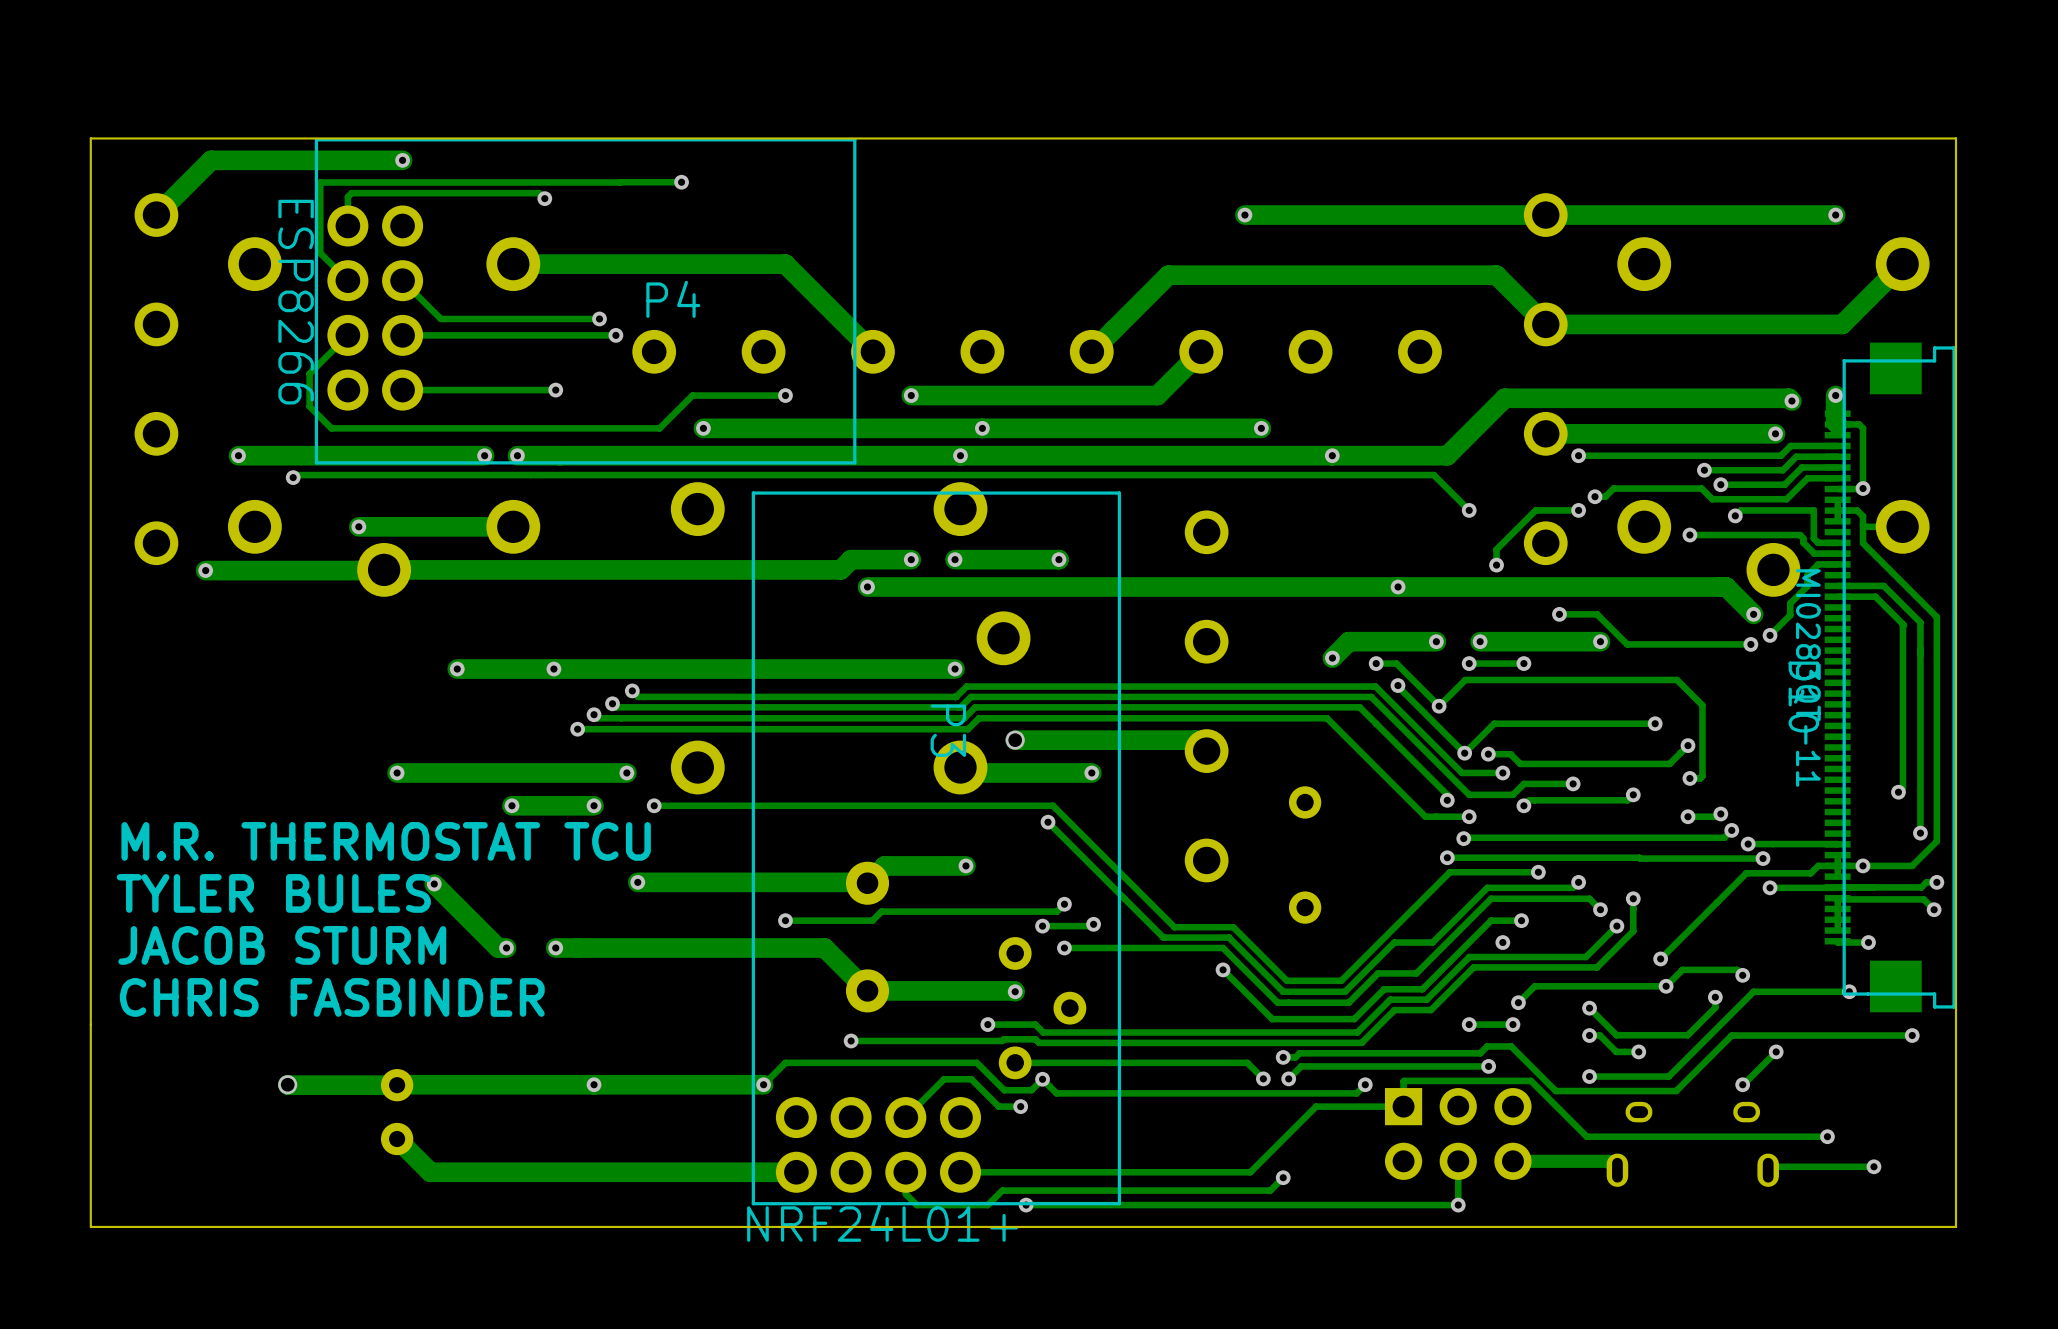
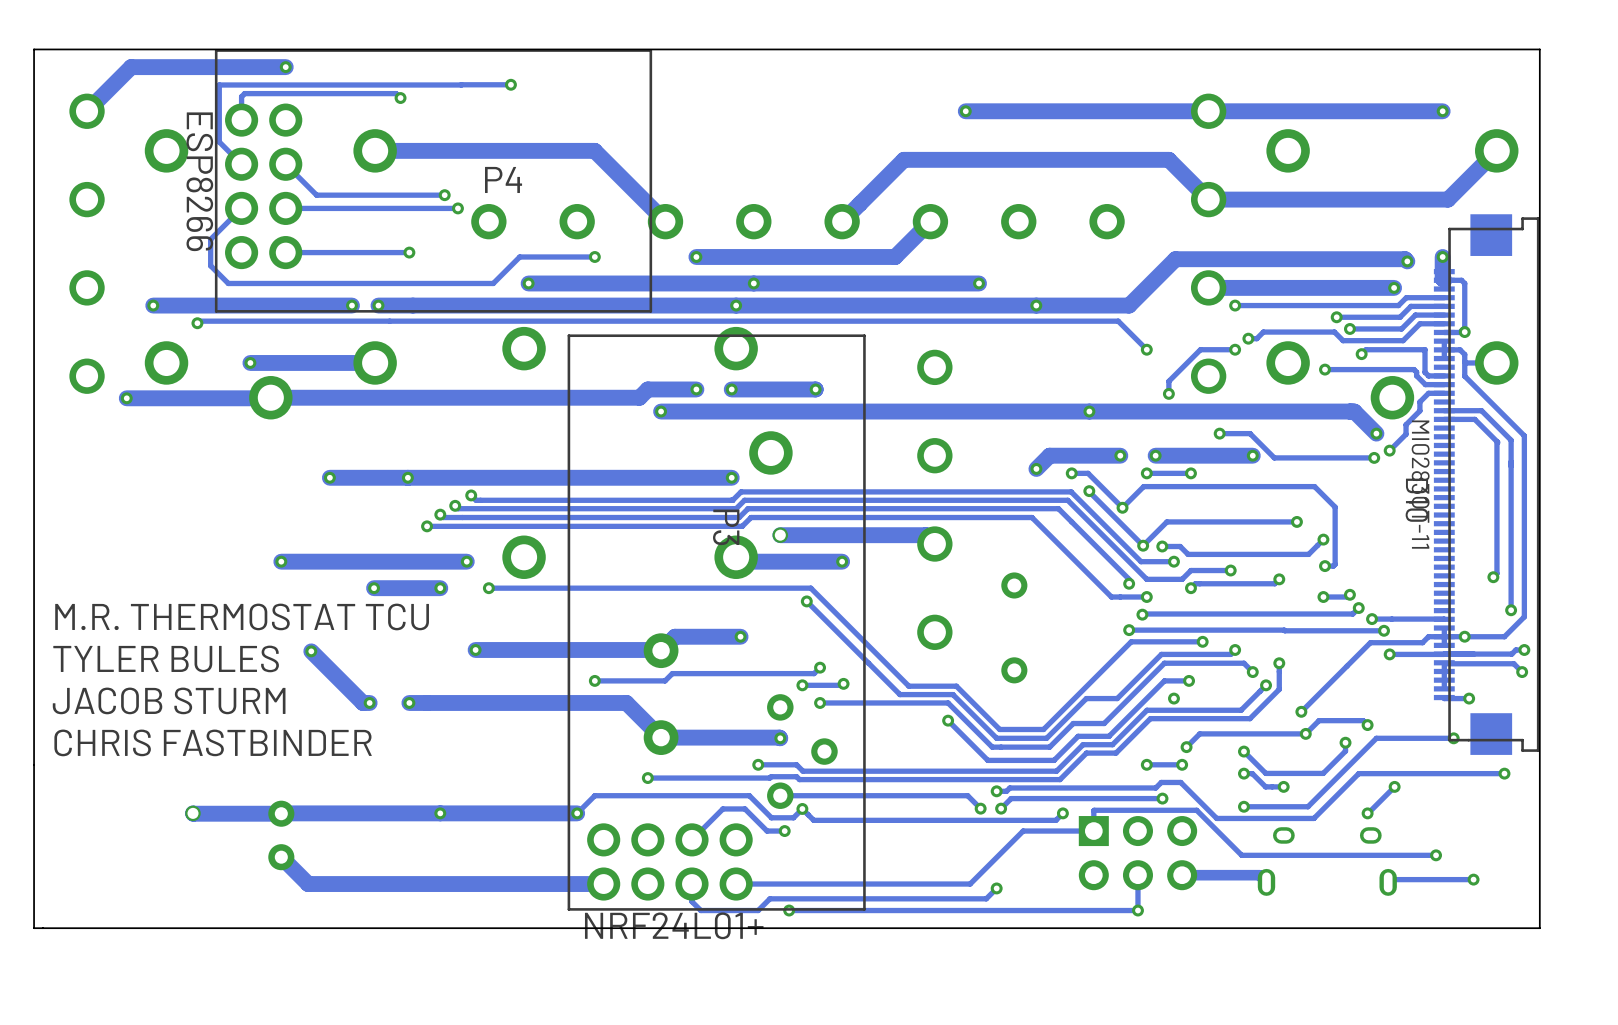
text: CHRIS FASBINDER (332, 997) -> CHRIS FASTBINDER (213, 742)

